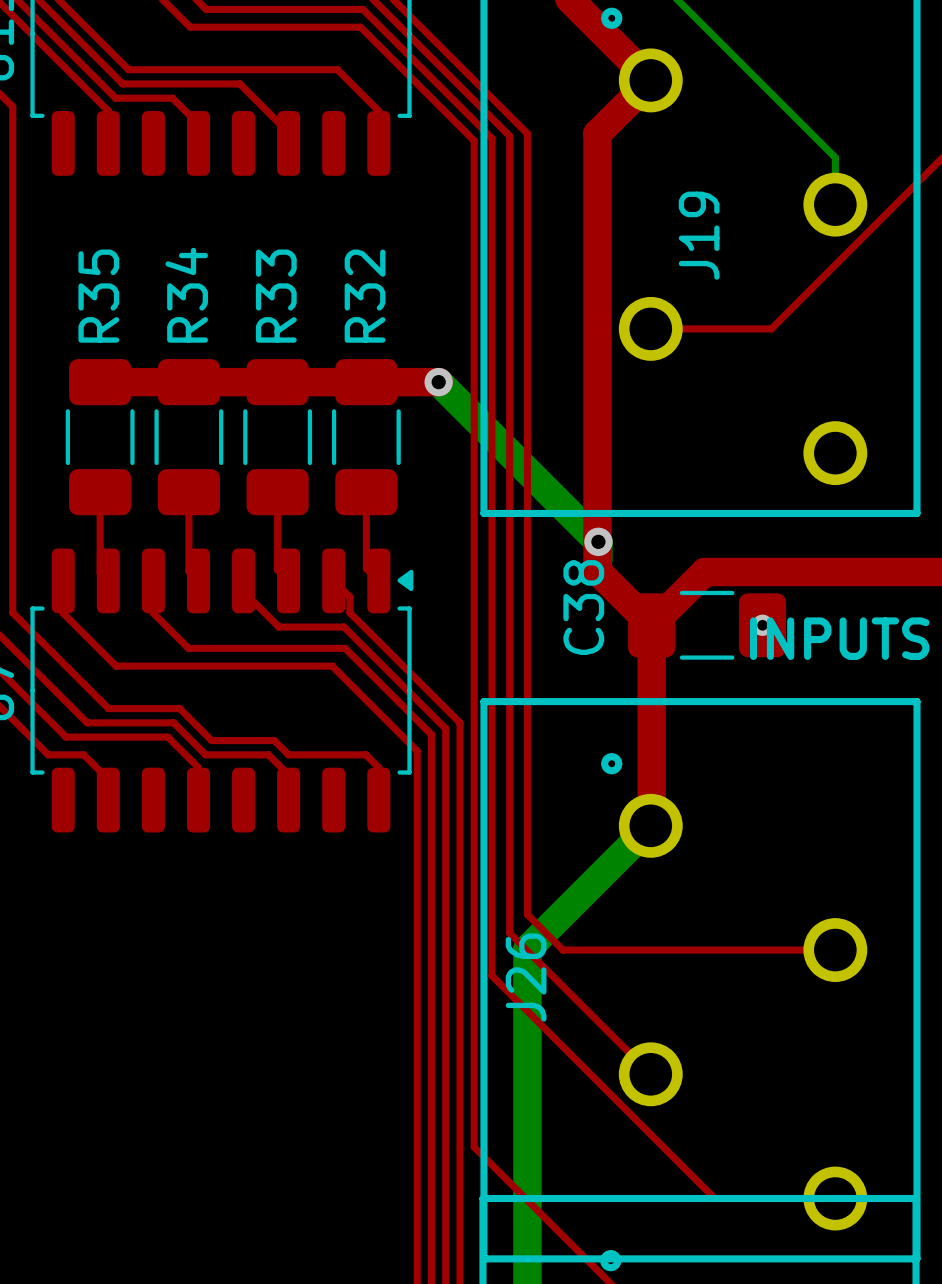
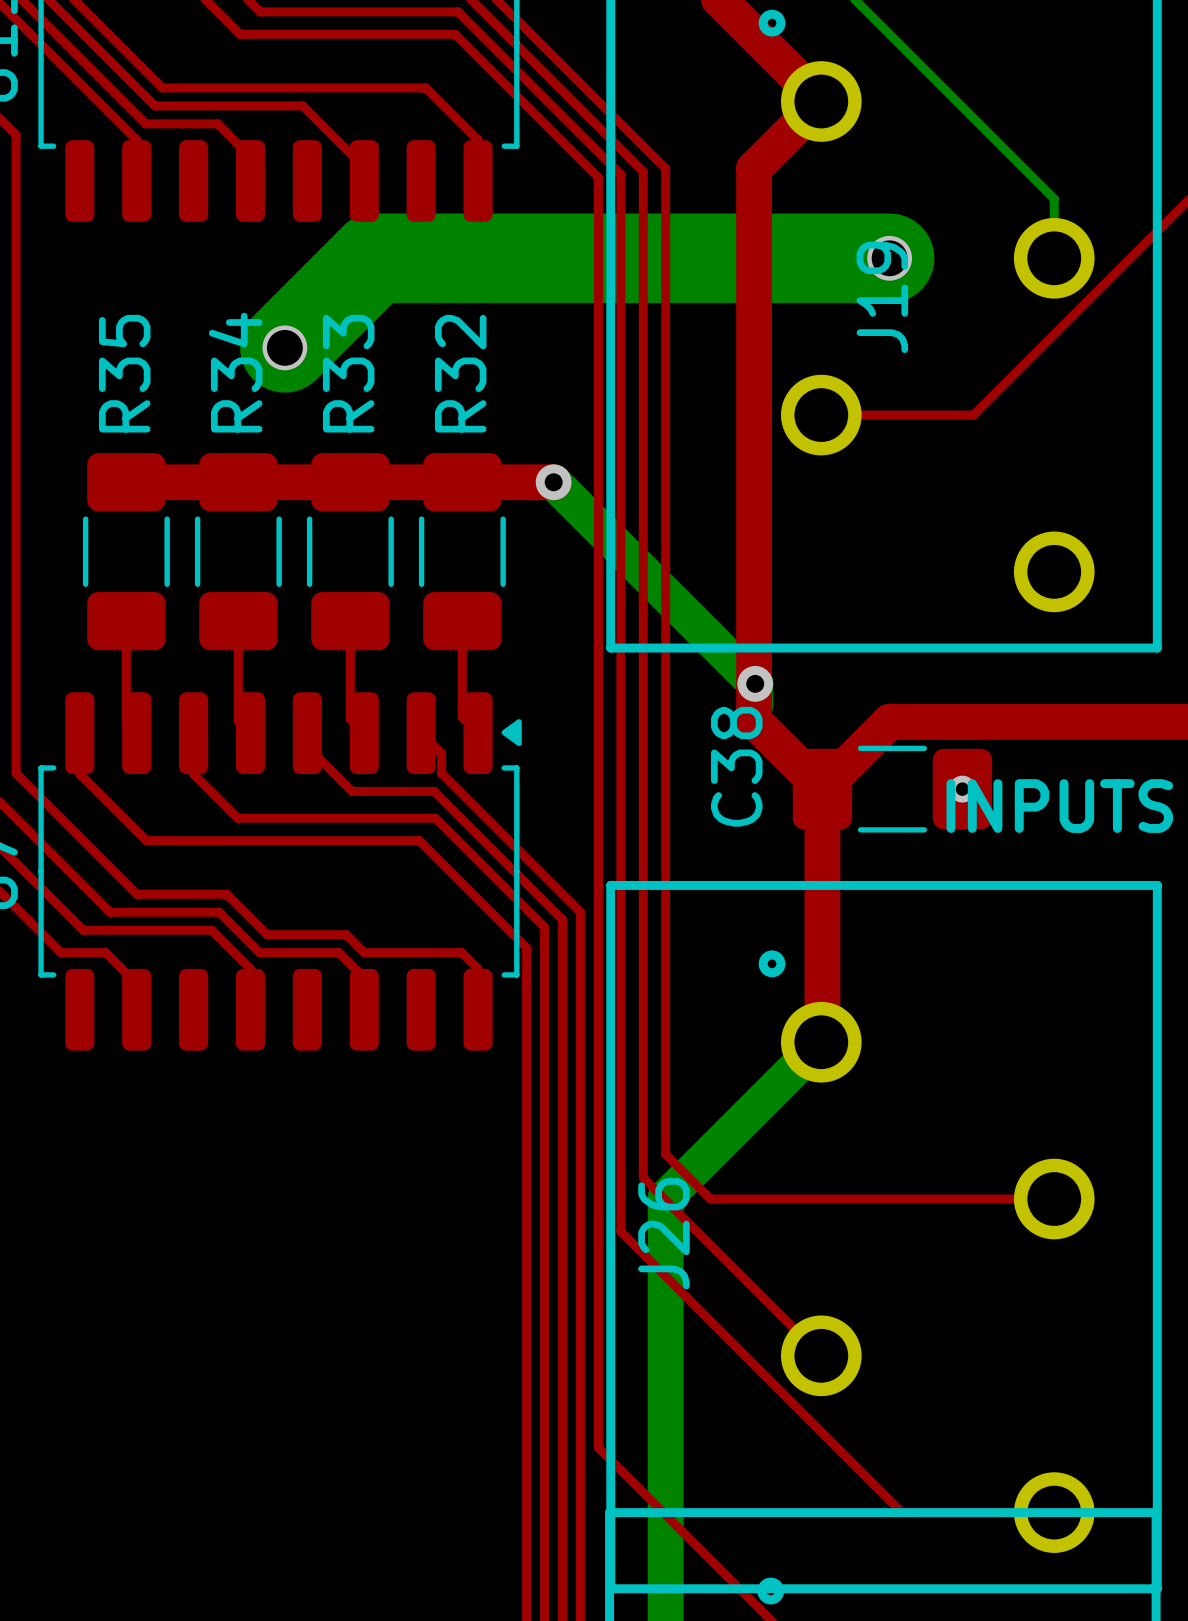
bottom track: none -> (889, 258) (374, 258) (284, 347)
via: none -> (889, 258)
via: none -> (284, 347)

